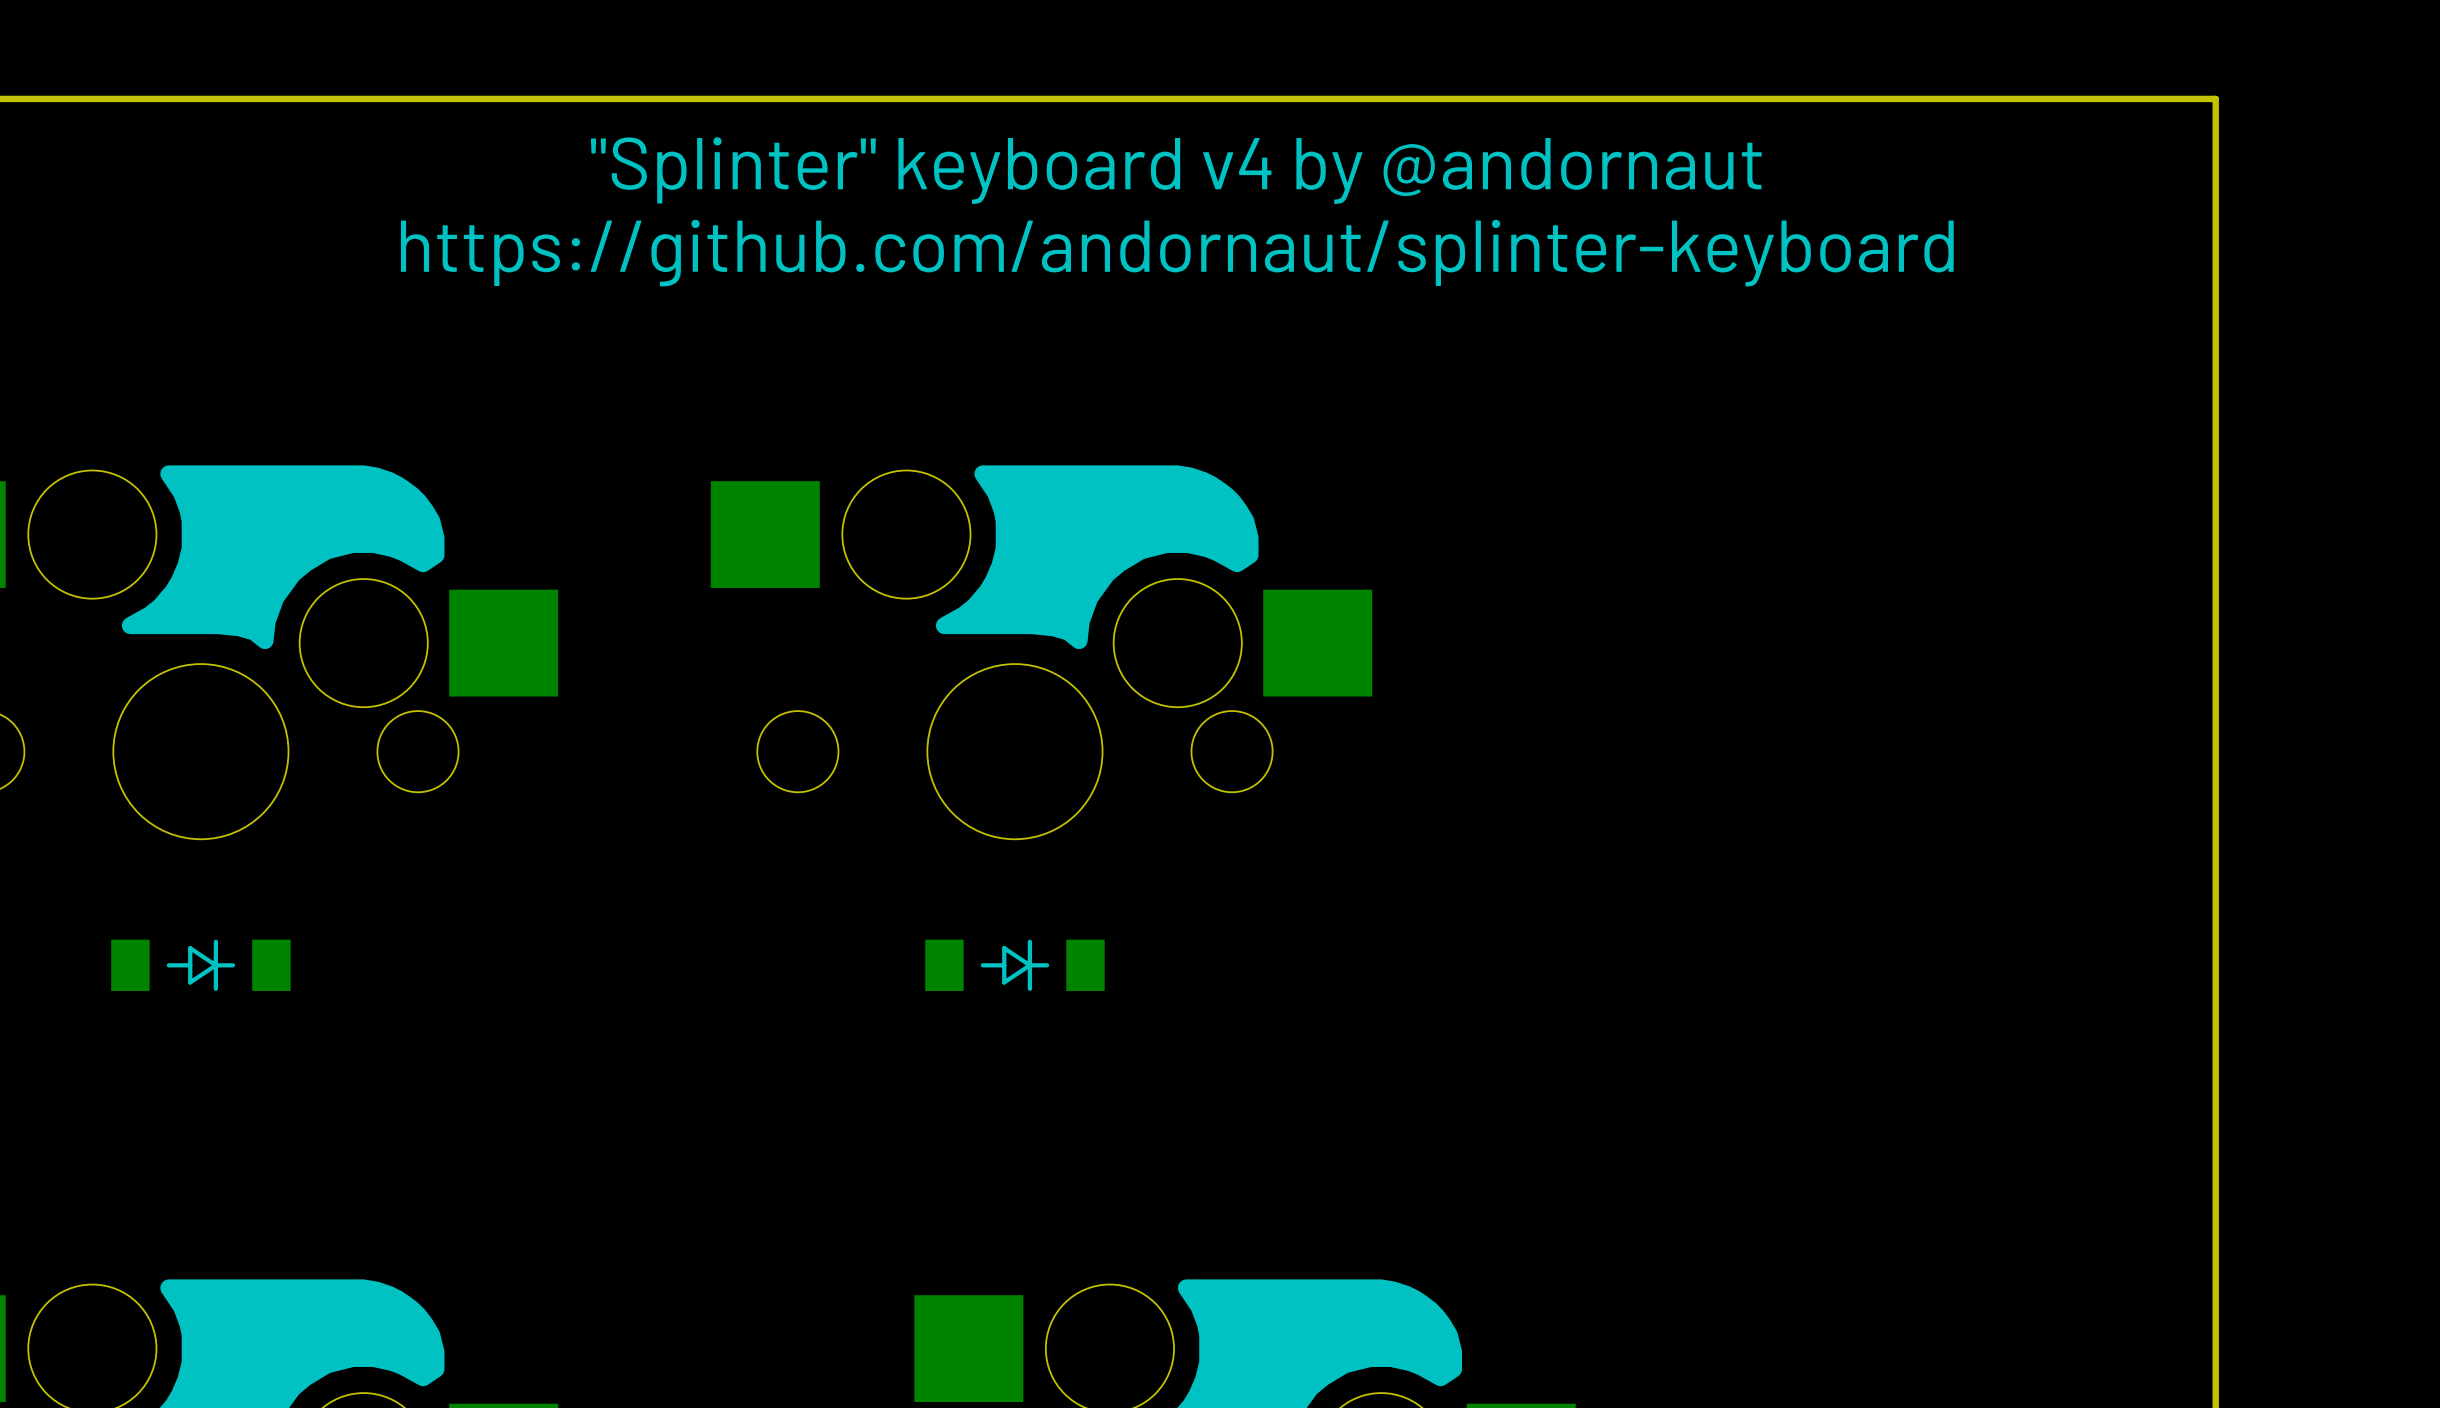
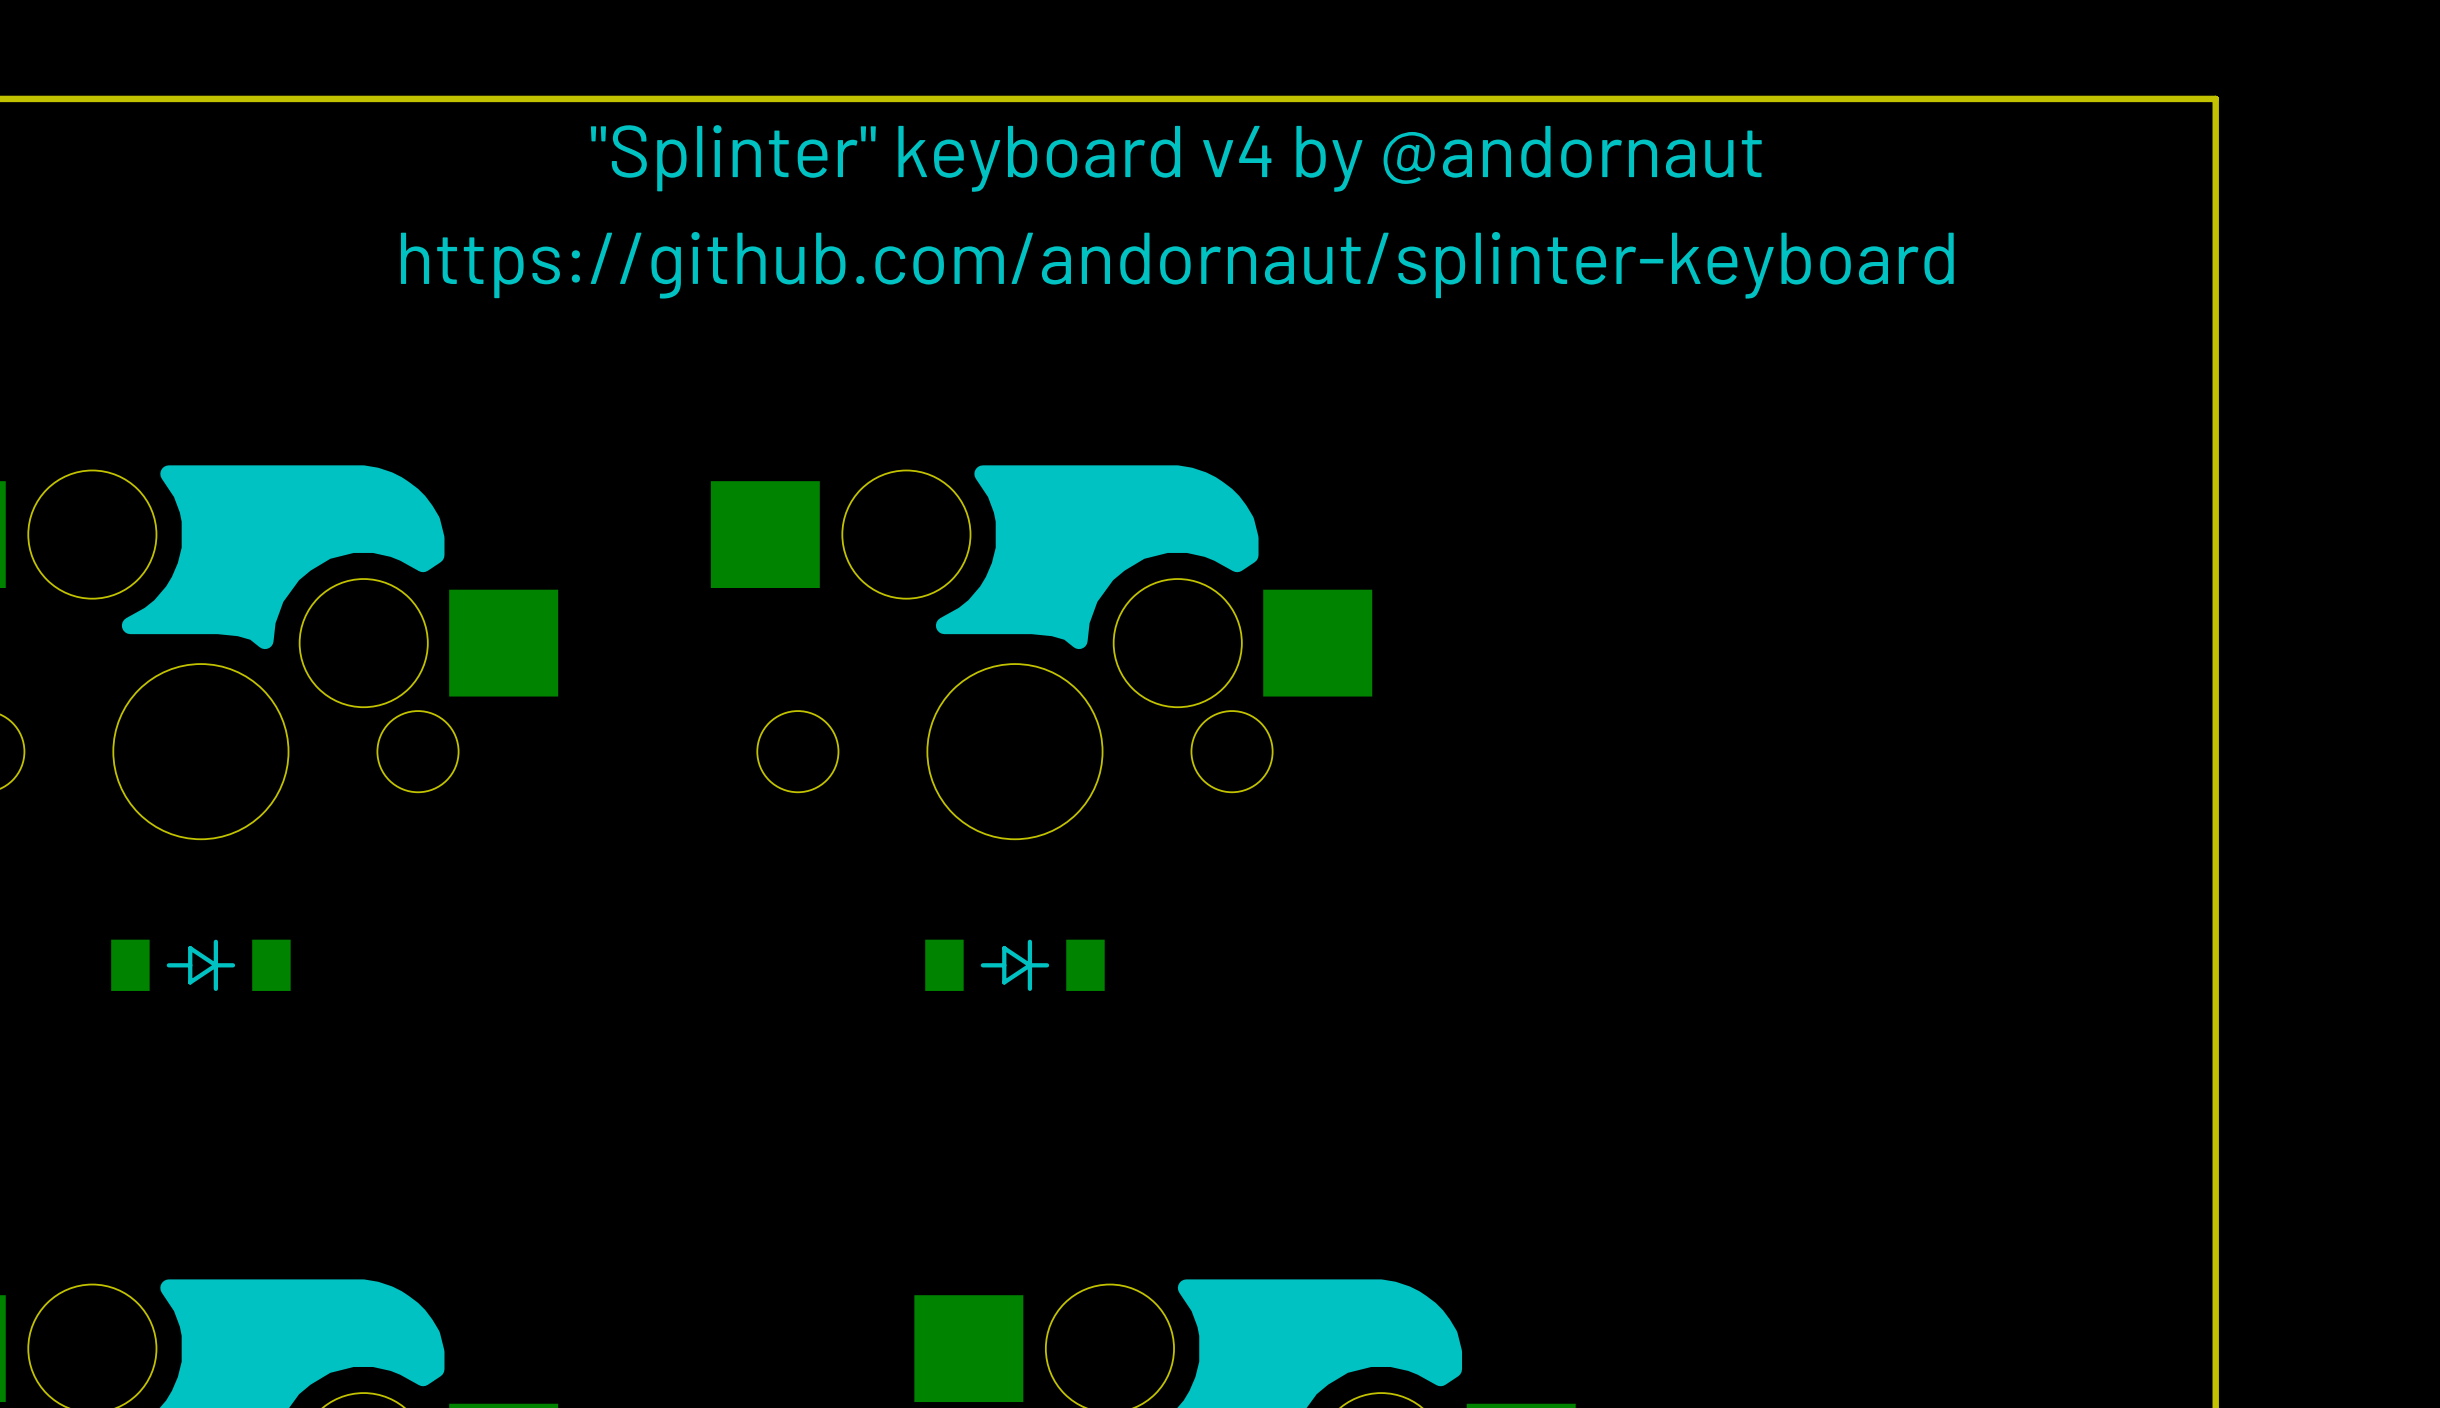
text position: "Splinter" keyboard v4 by @andornaut (1176, 170) -> "Splinter" keyboard v4 by @andornaut (1176, 158)
text position: https://github.com/andornaut/splinter-keyboard (1177, 253) -> https://github.com/andornaut/splinter-keyboard (1177, 265)

